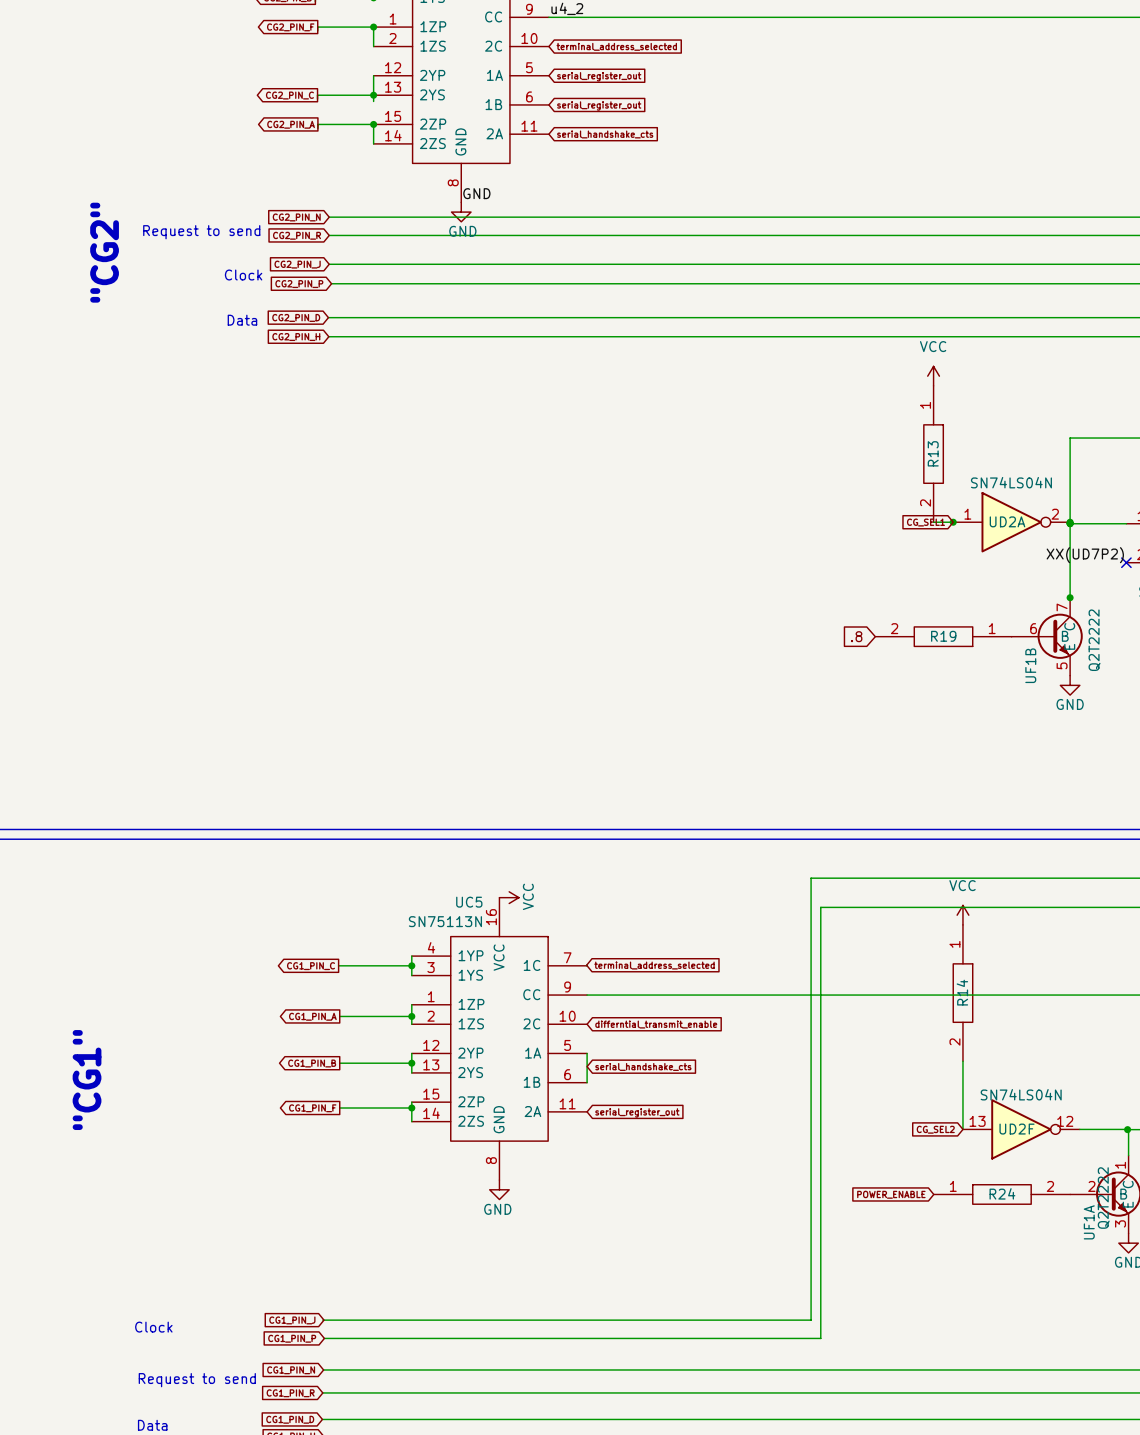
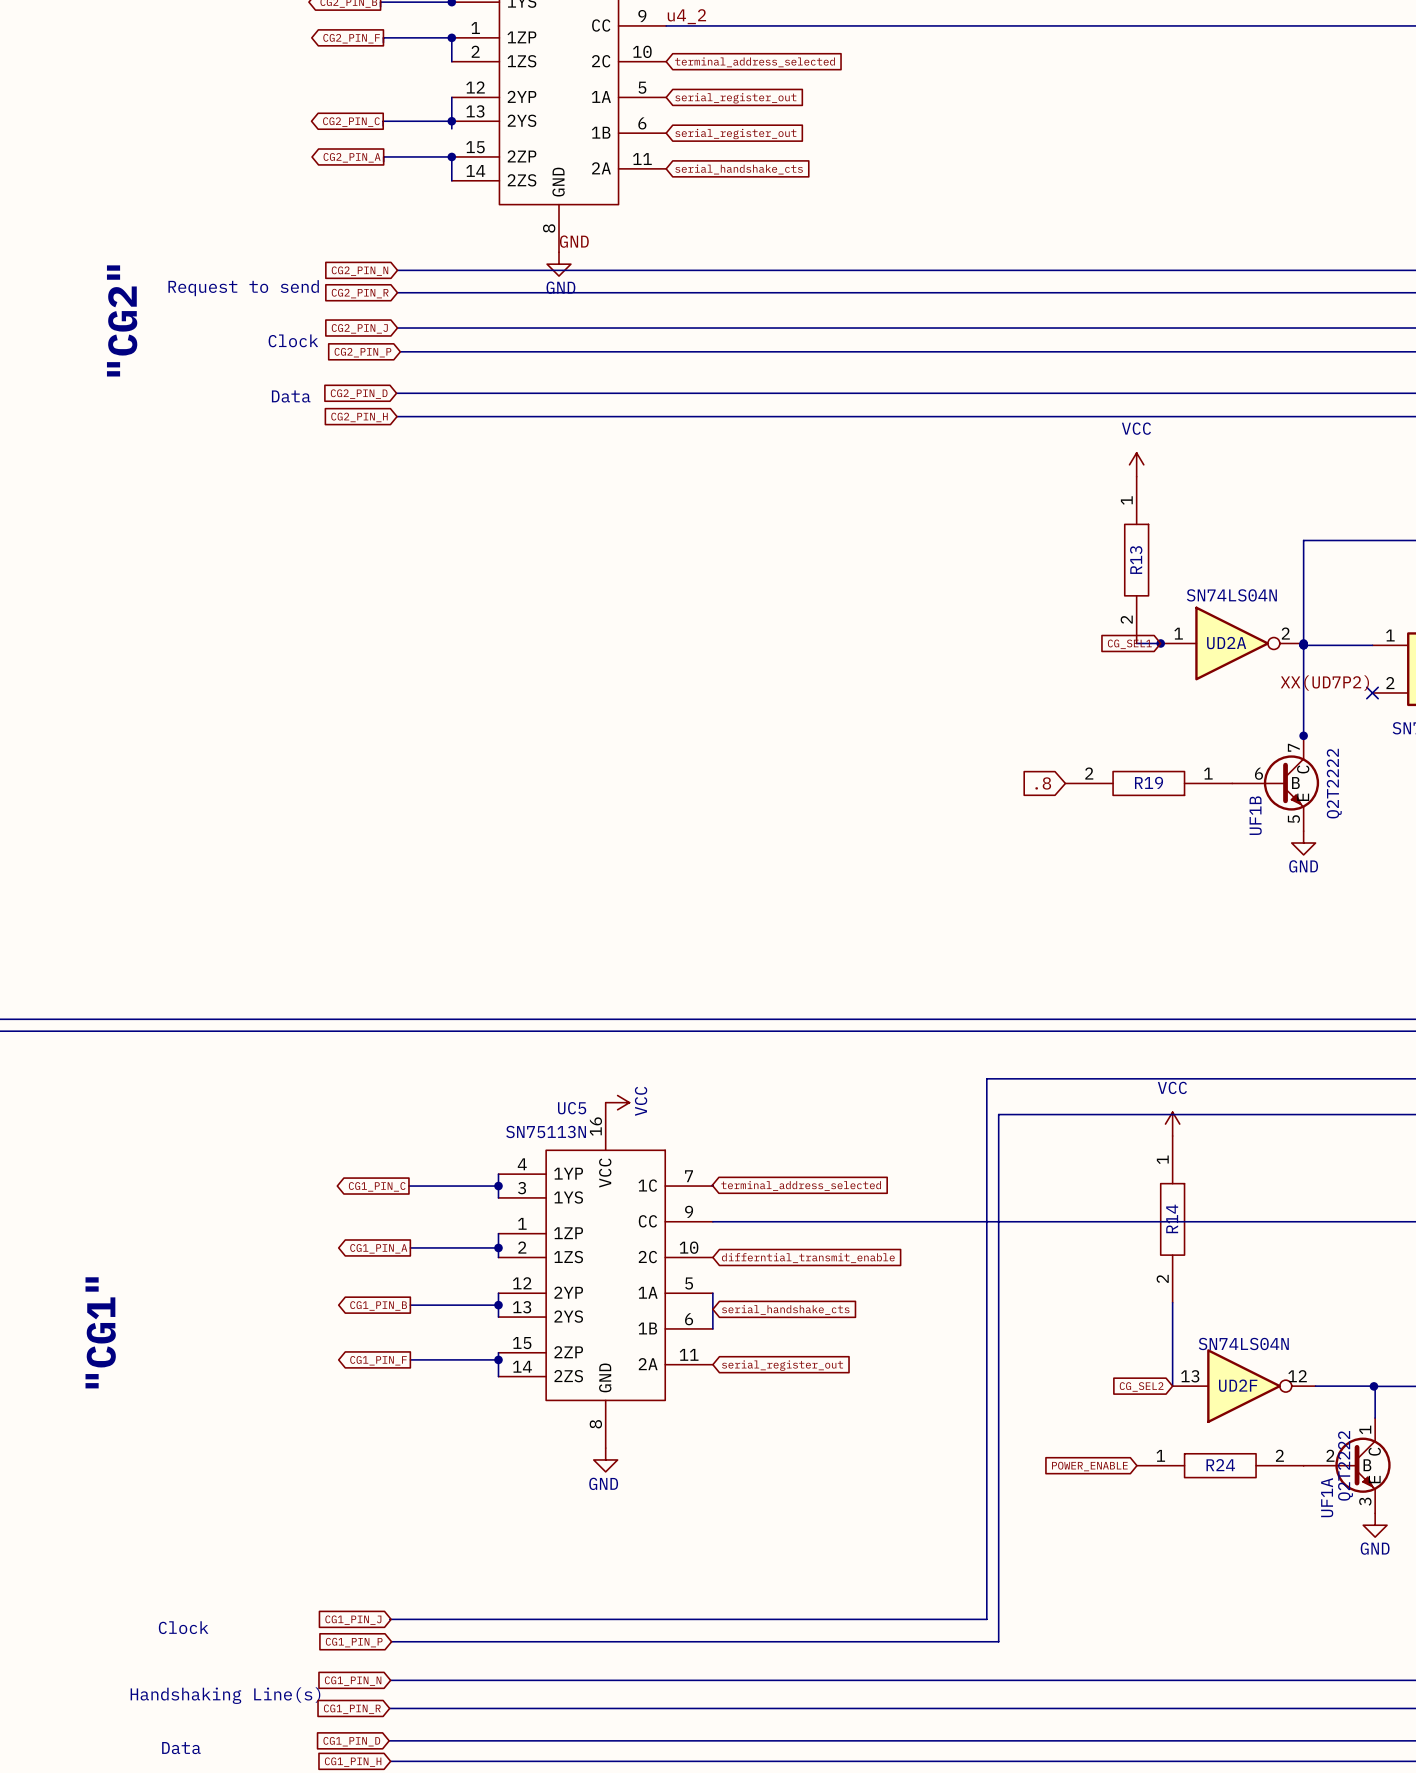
text: Request to send (197, 1380) -> none
text: none -> Handshaking Line(s) (225, 1695)

